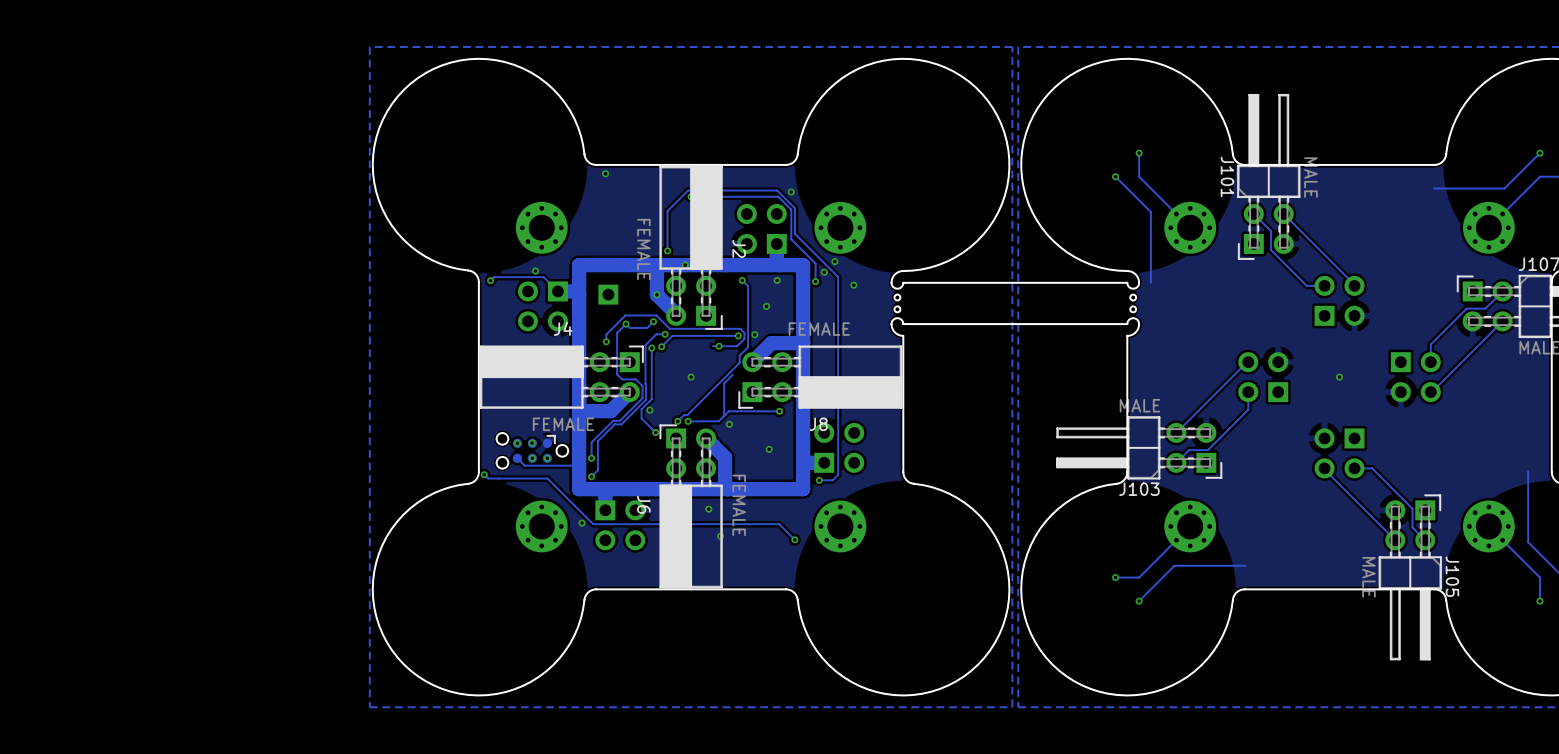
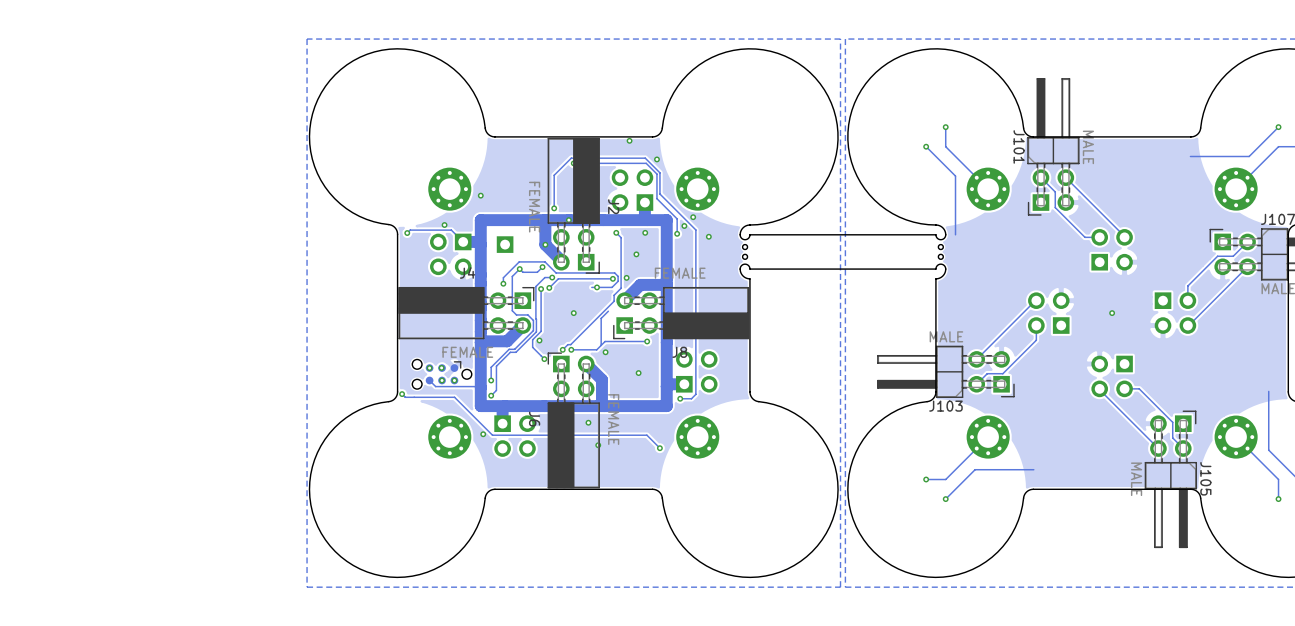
via: none -> (629, 140)
via position: (605, 173) -> (480, 195)

